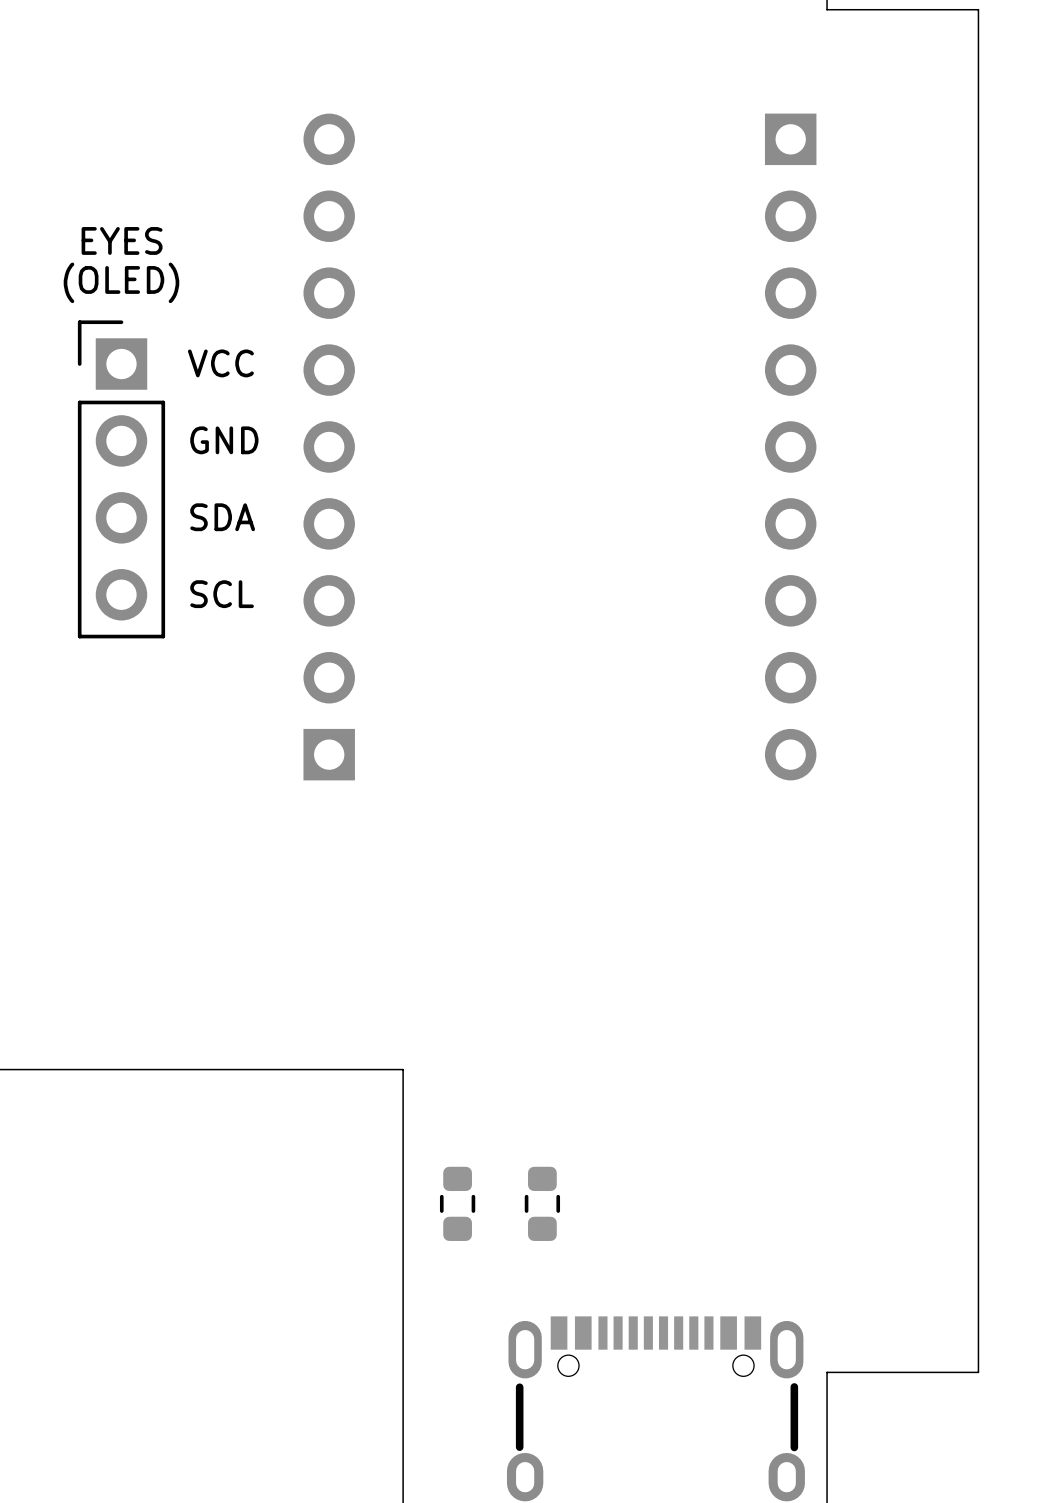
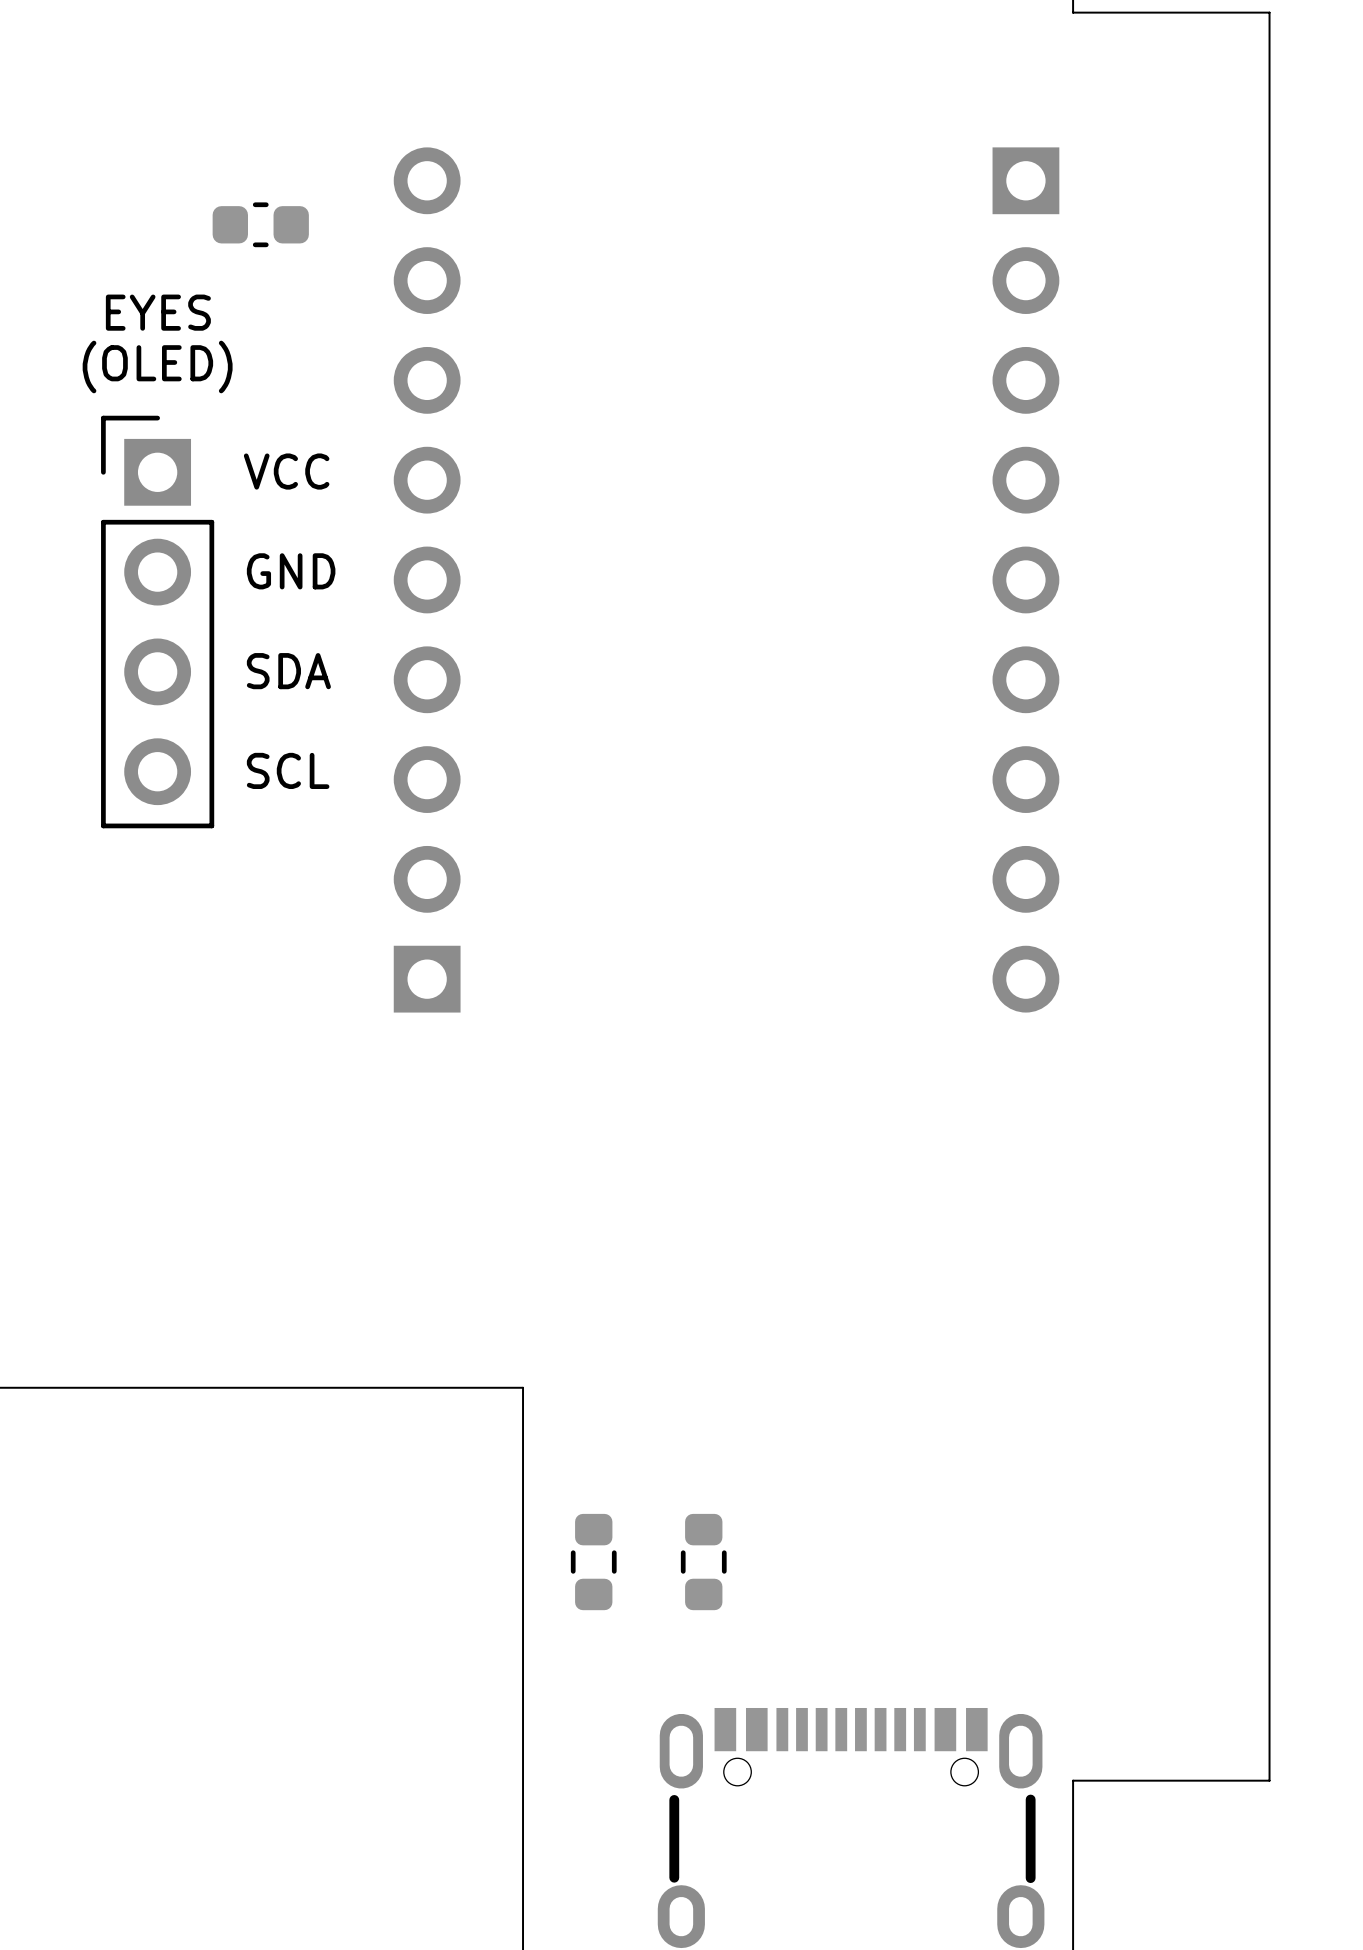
part: none -> (260, 224)

